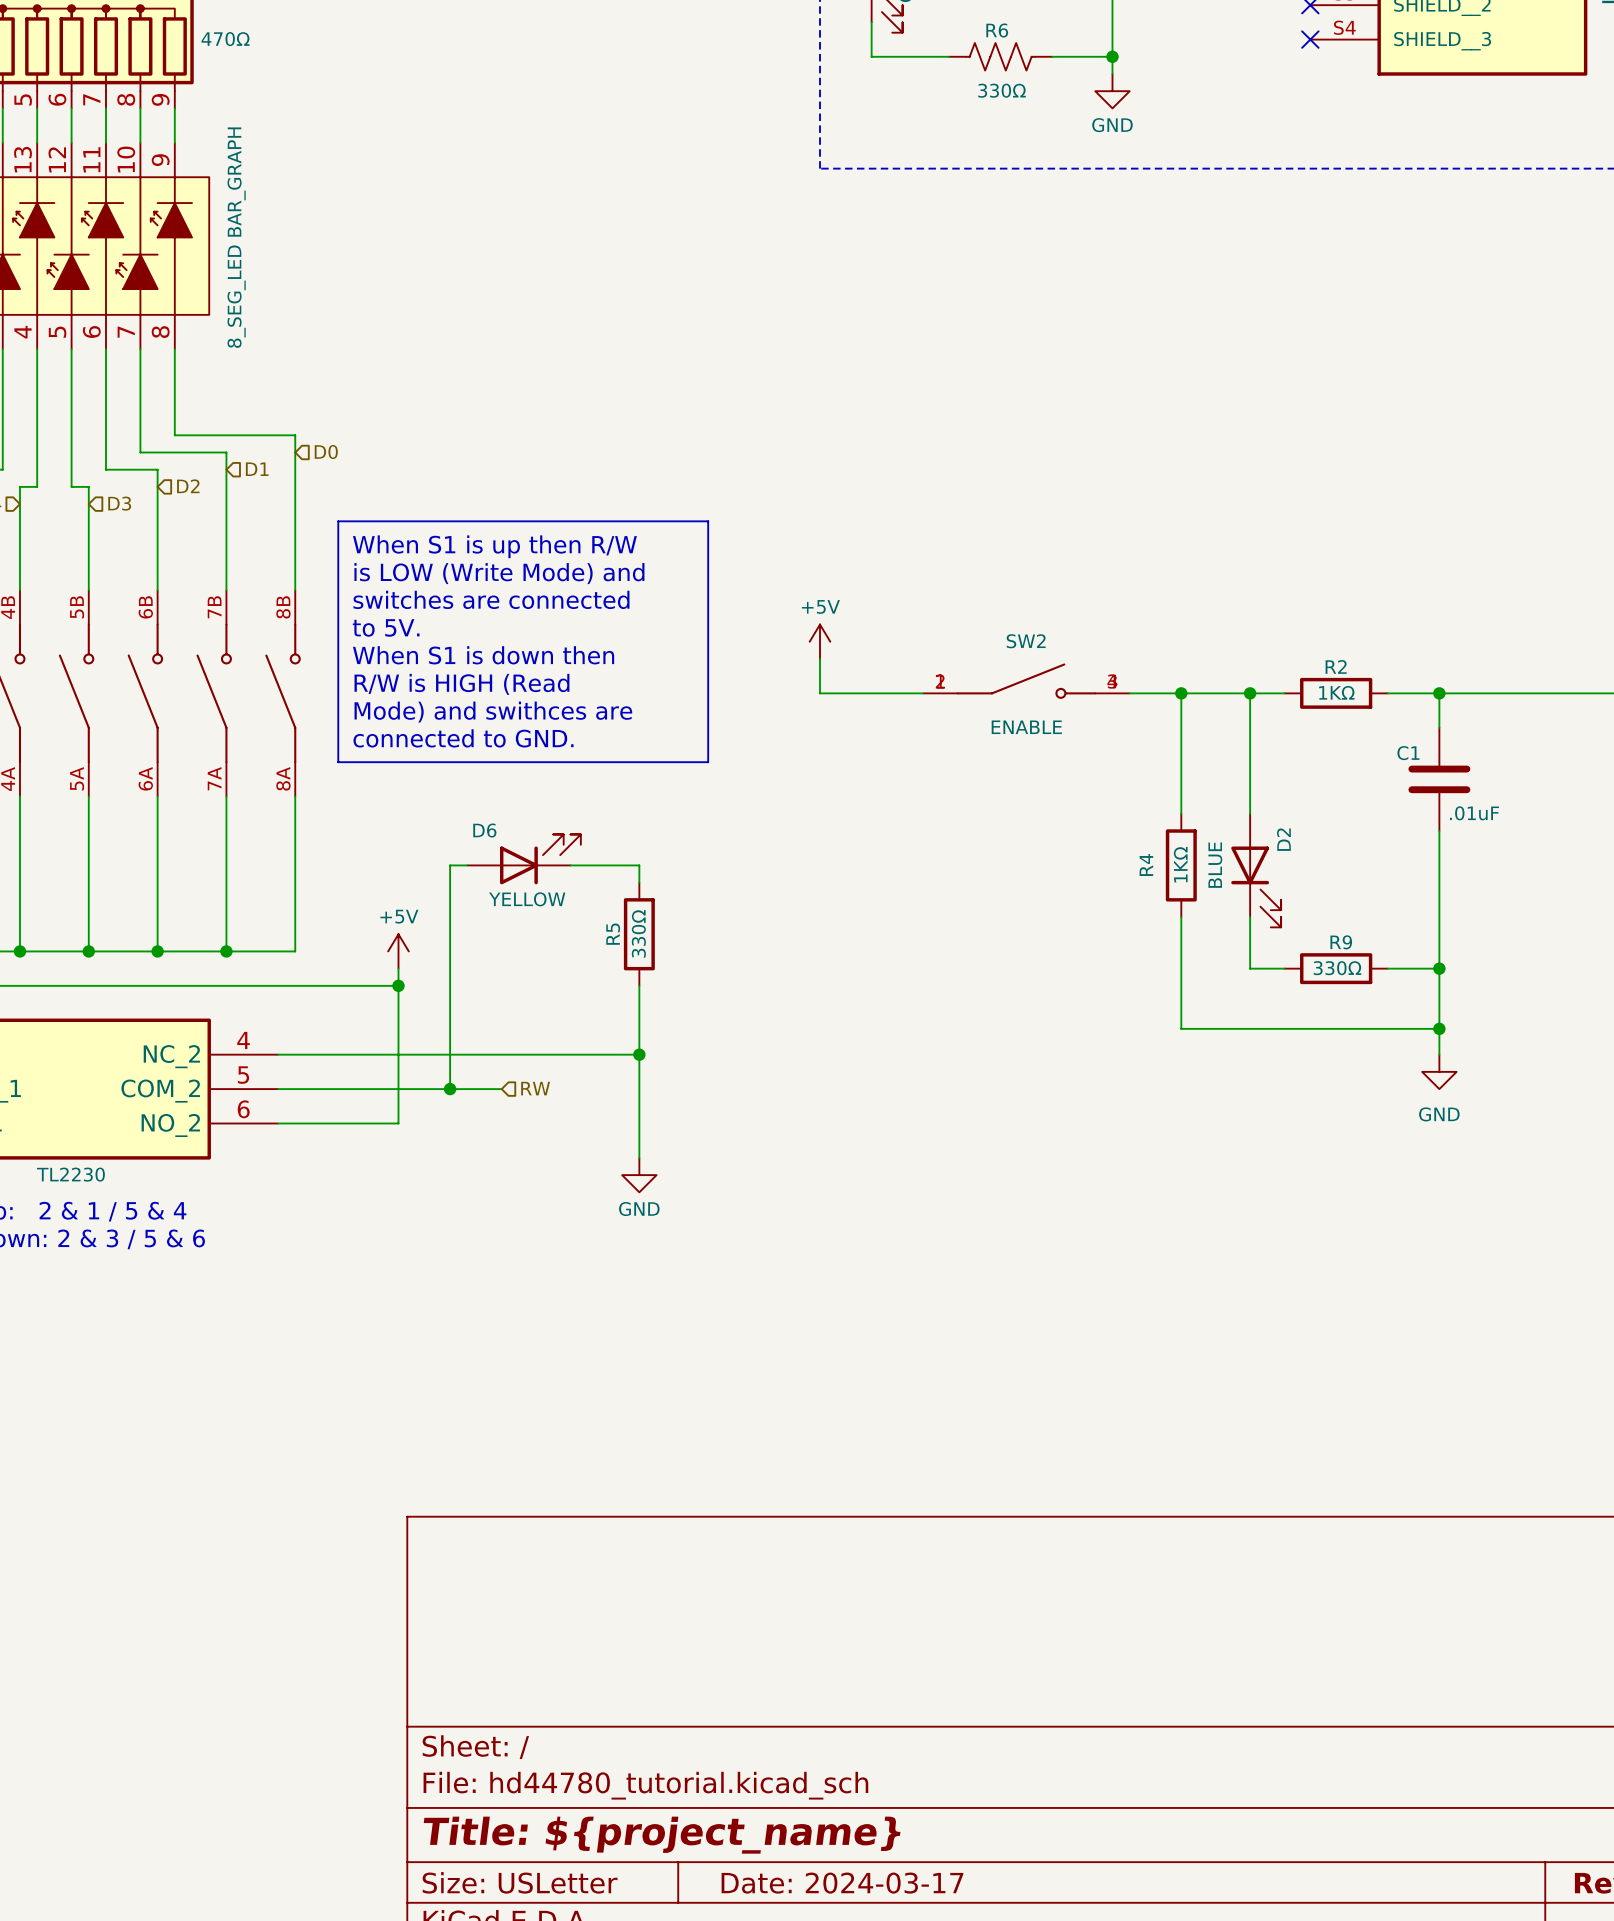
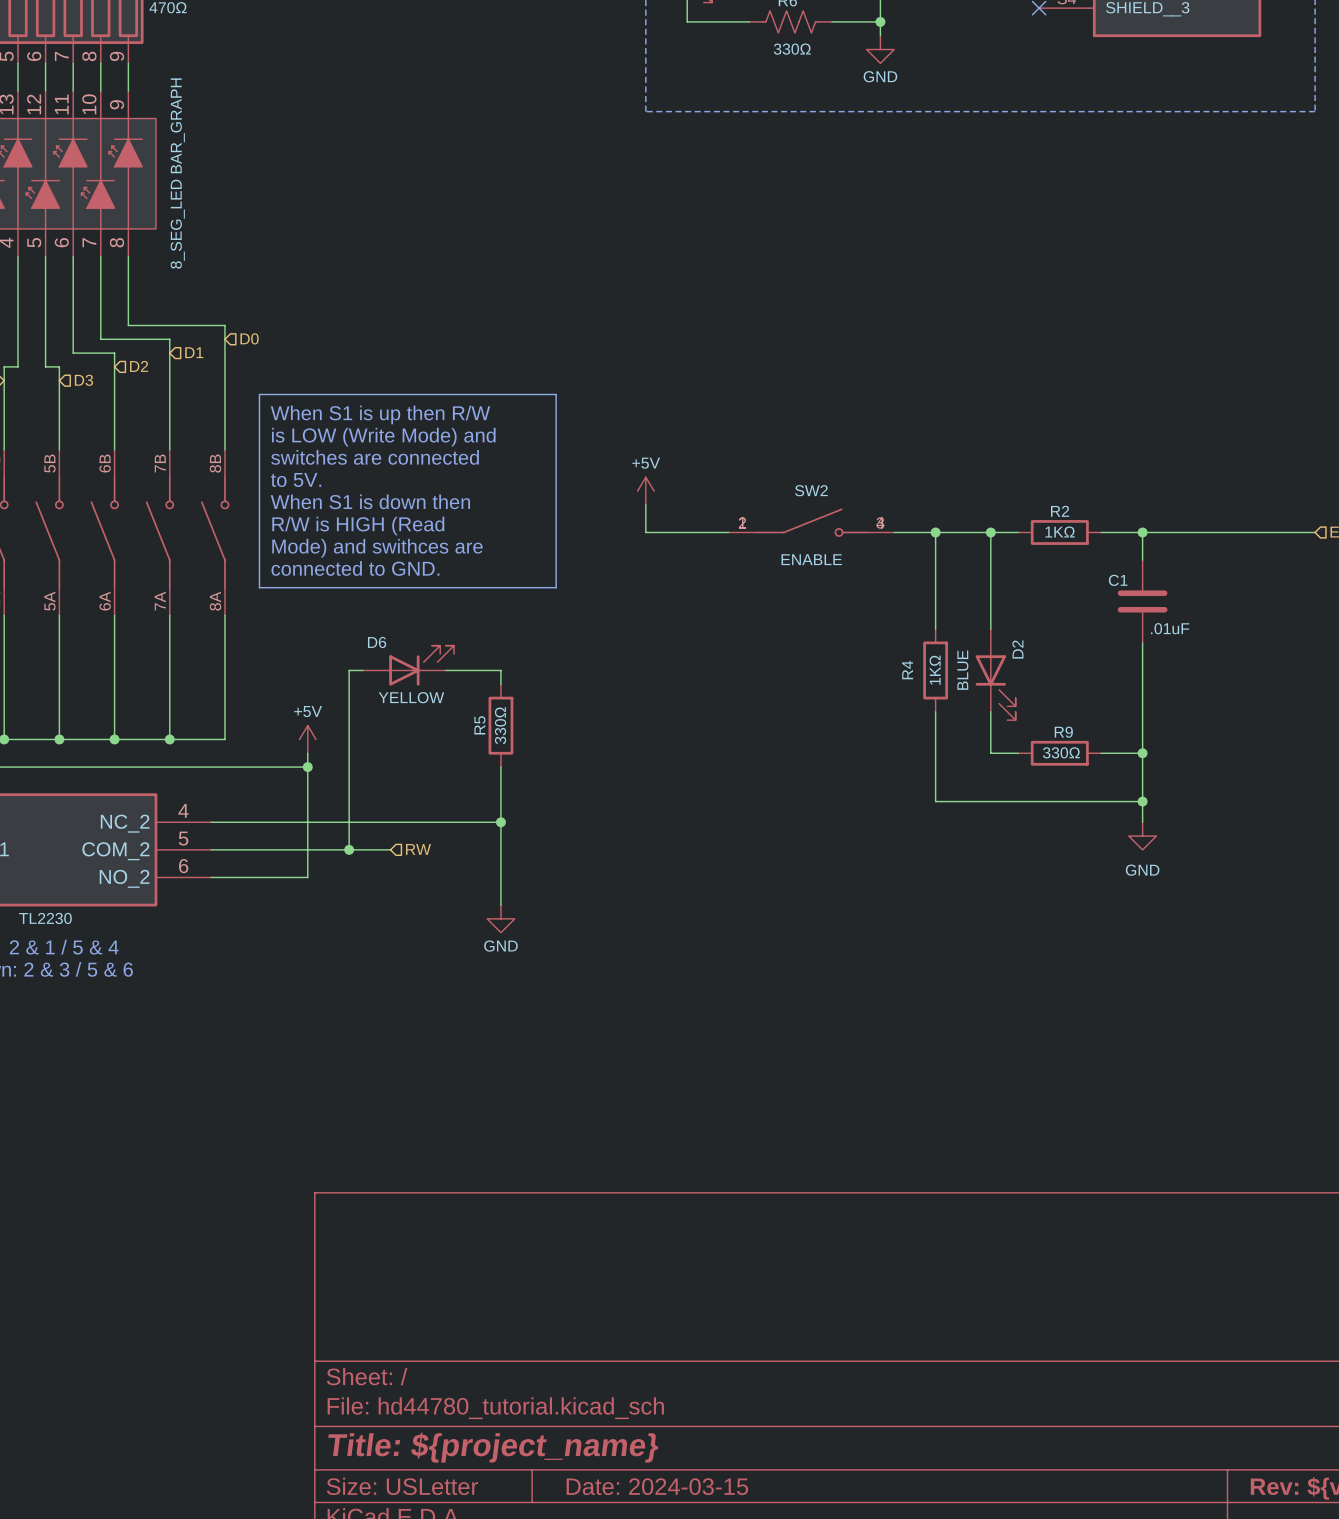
title block: Date: 2024-03-17 (842, 1883) -> Date: 2024-03-15 (657, 1486)

